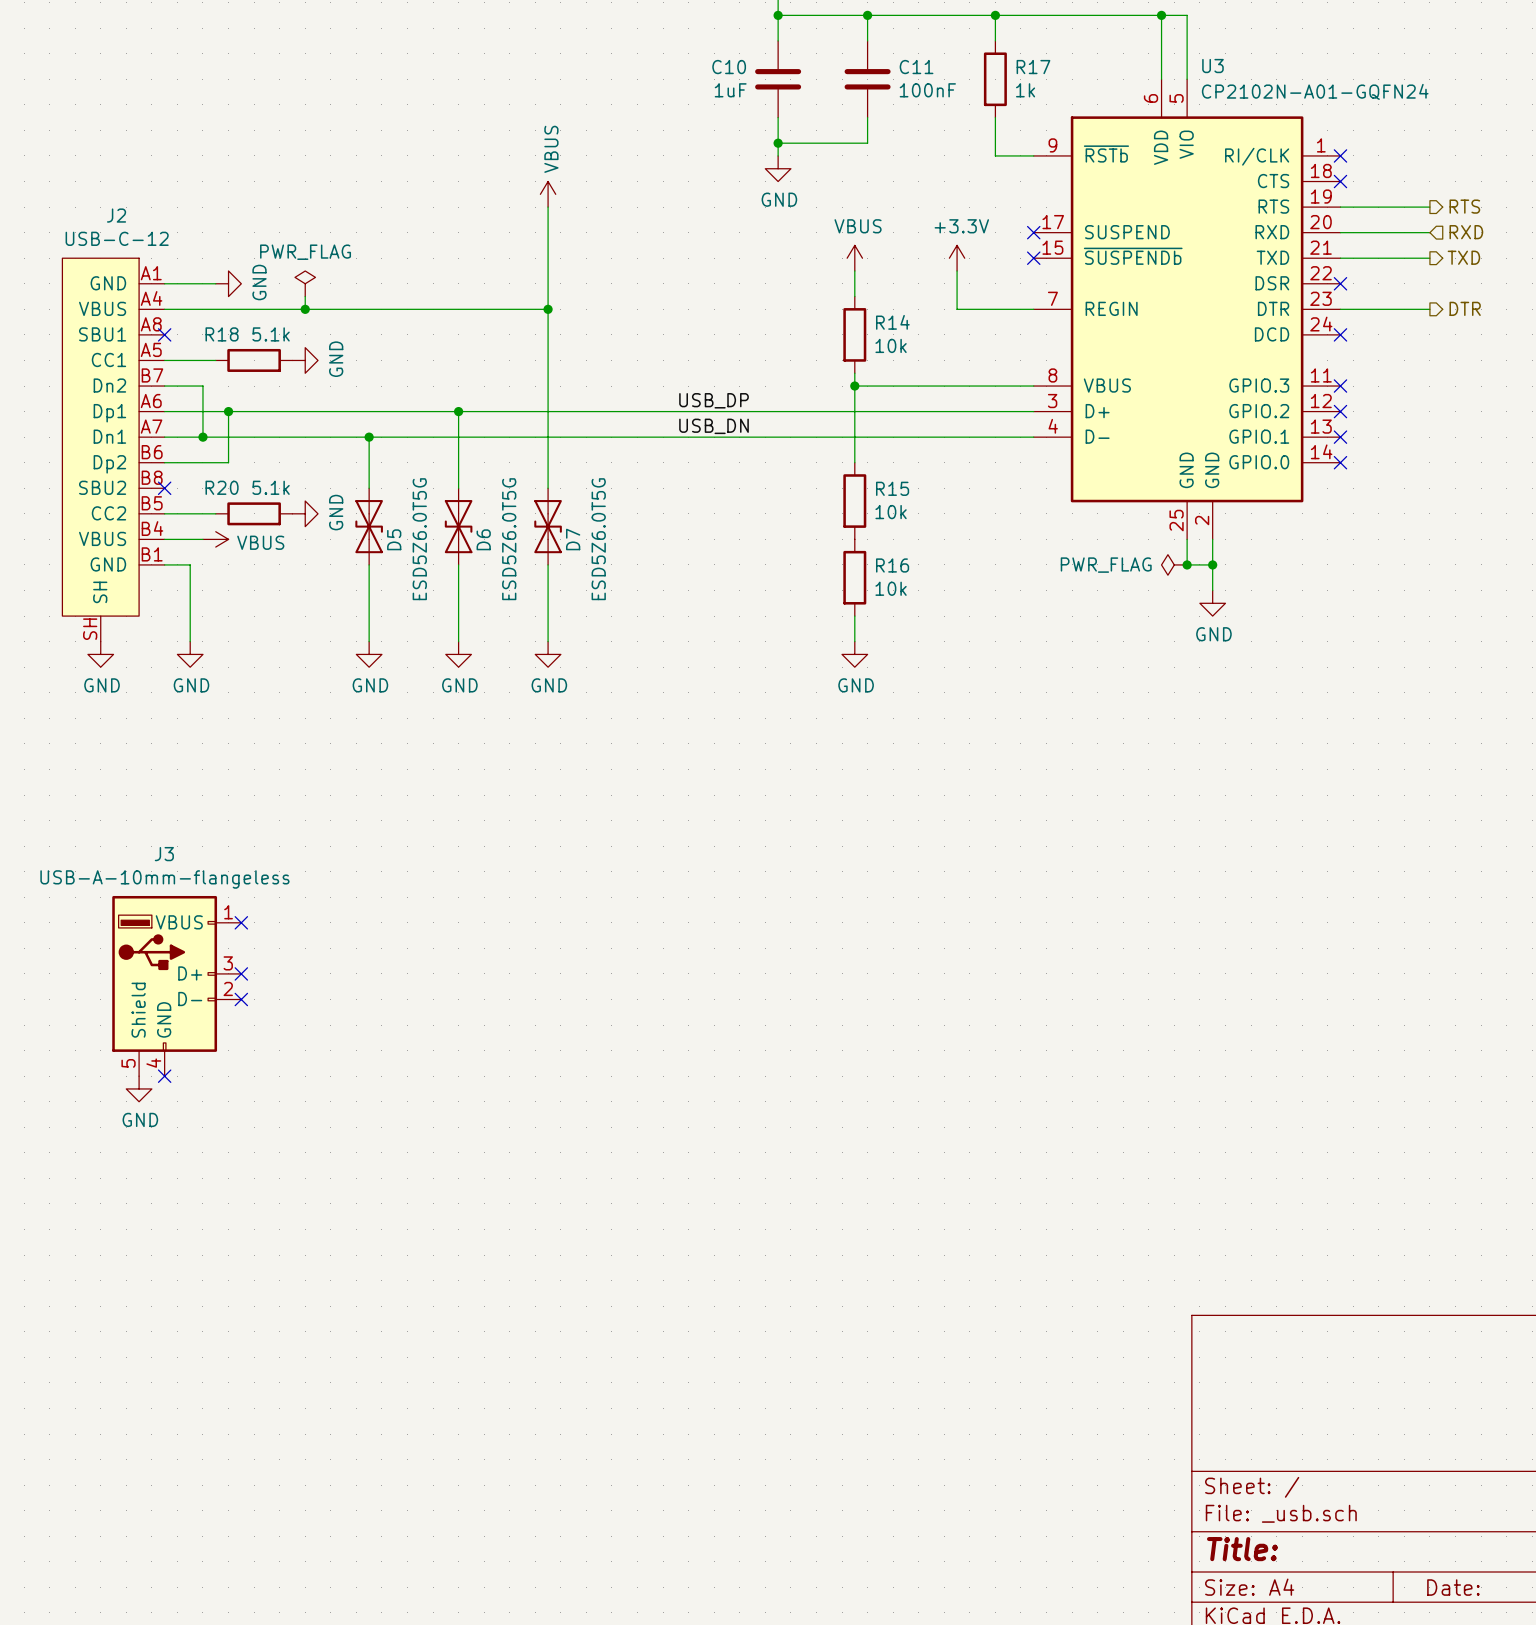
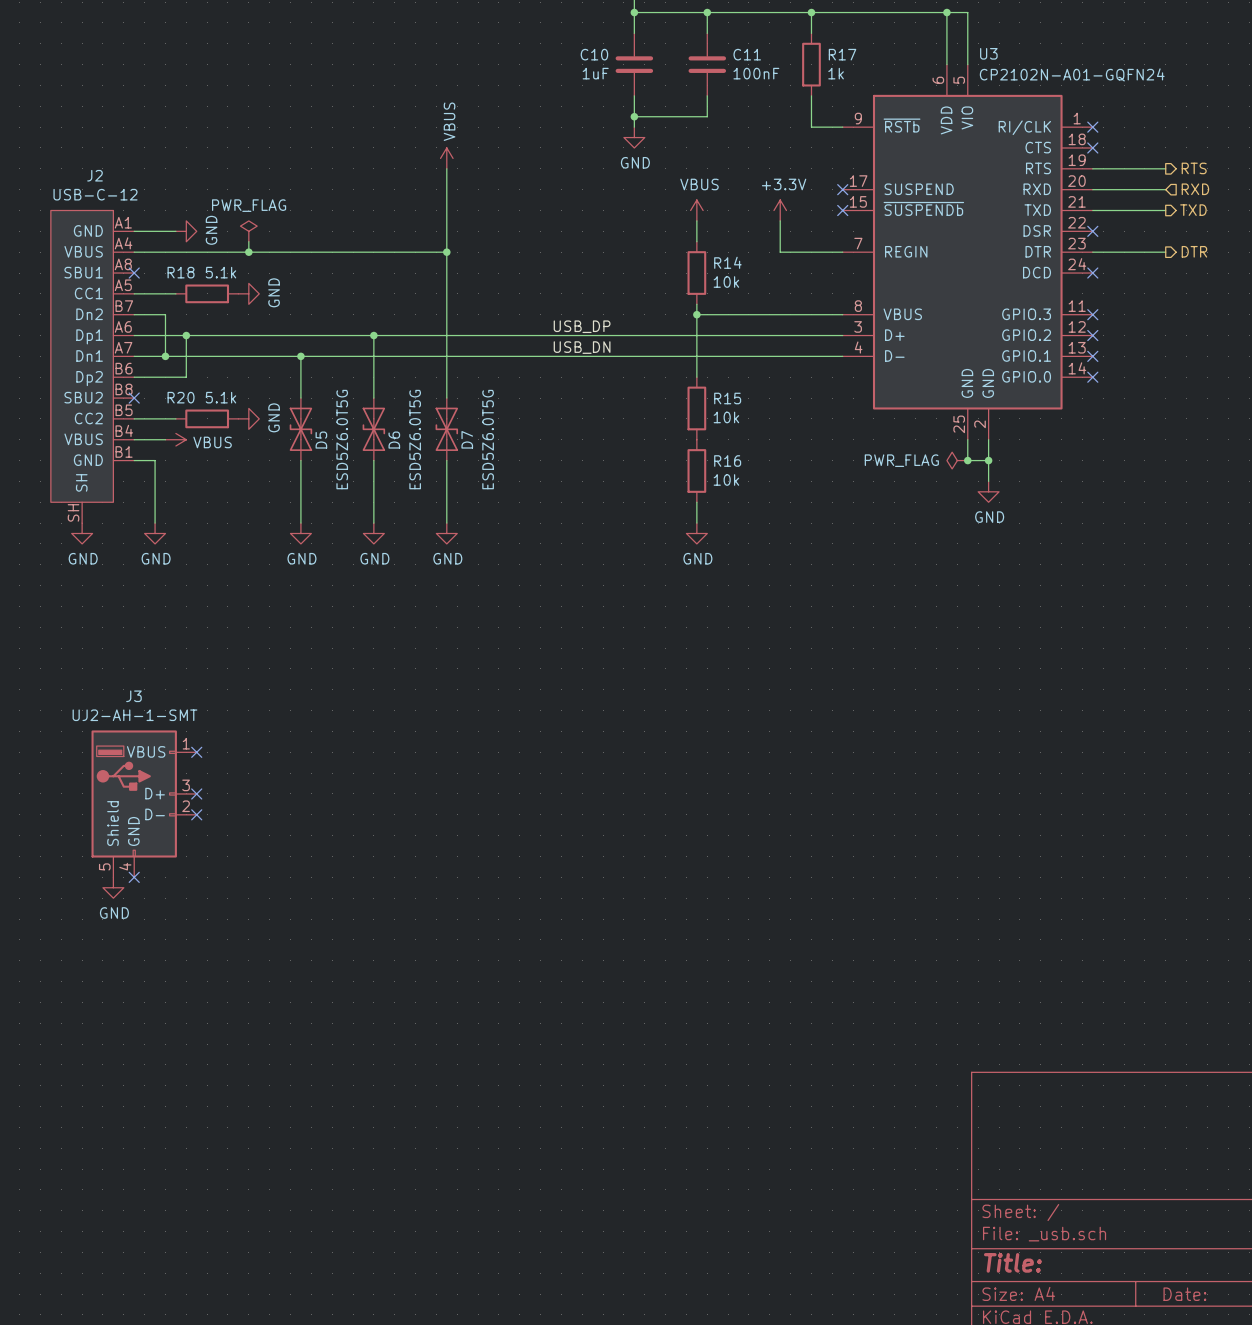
J3 value: USB-A-10mm-flangeless (164, 879) -> UJ2-AH-1-SMT (134, 715)

